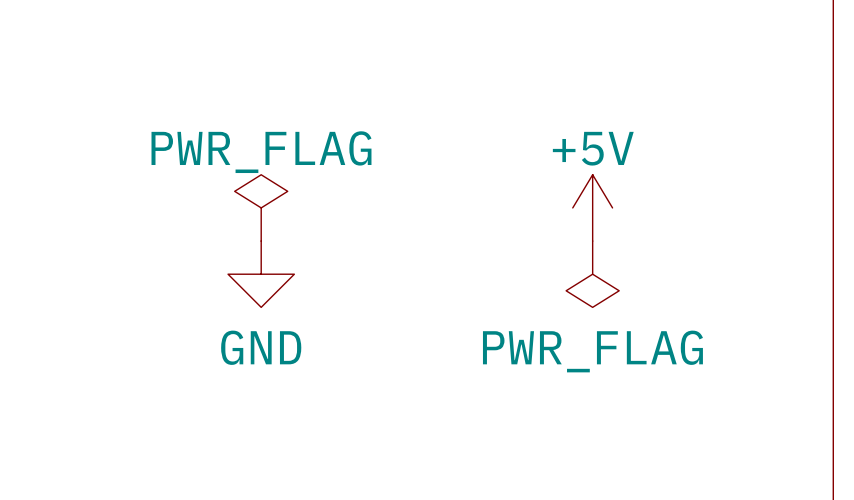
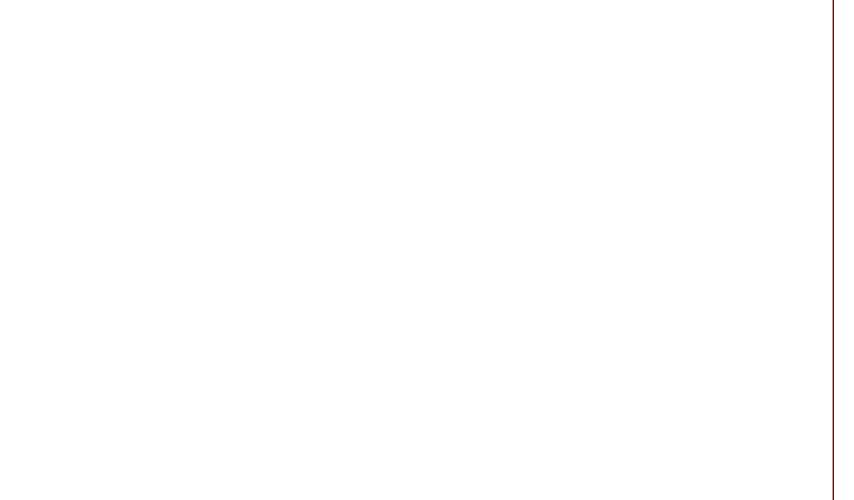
power symbol: PWR_FLAG (261, 207) -> none
power symbol: +5V (592, 207) -> none
power symbol: GND (261, 274) -> none
power symbol: PWR_FLAG (592, 274) -> none

